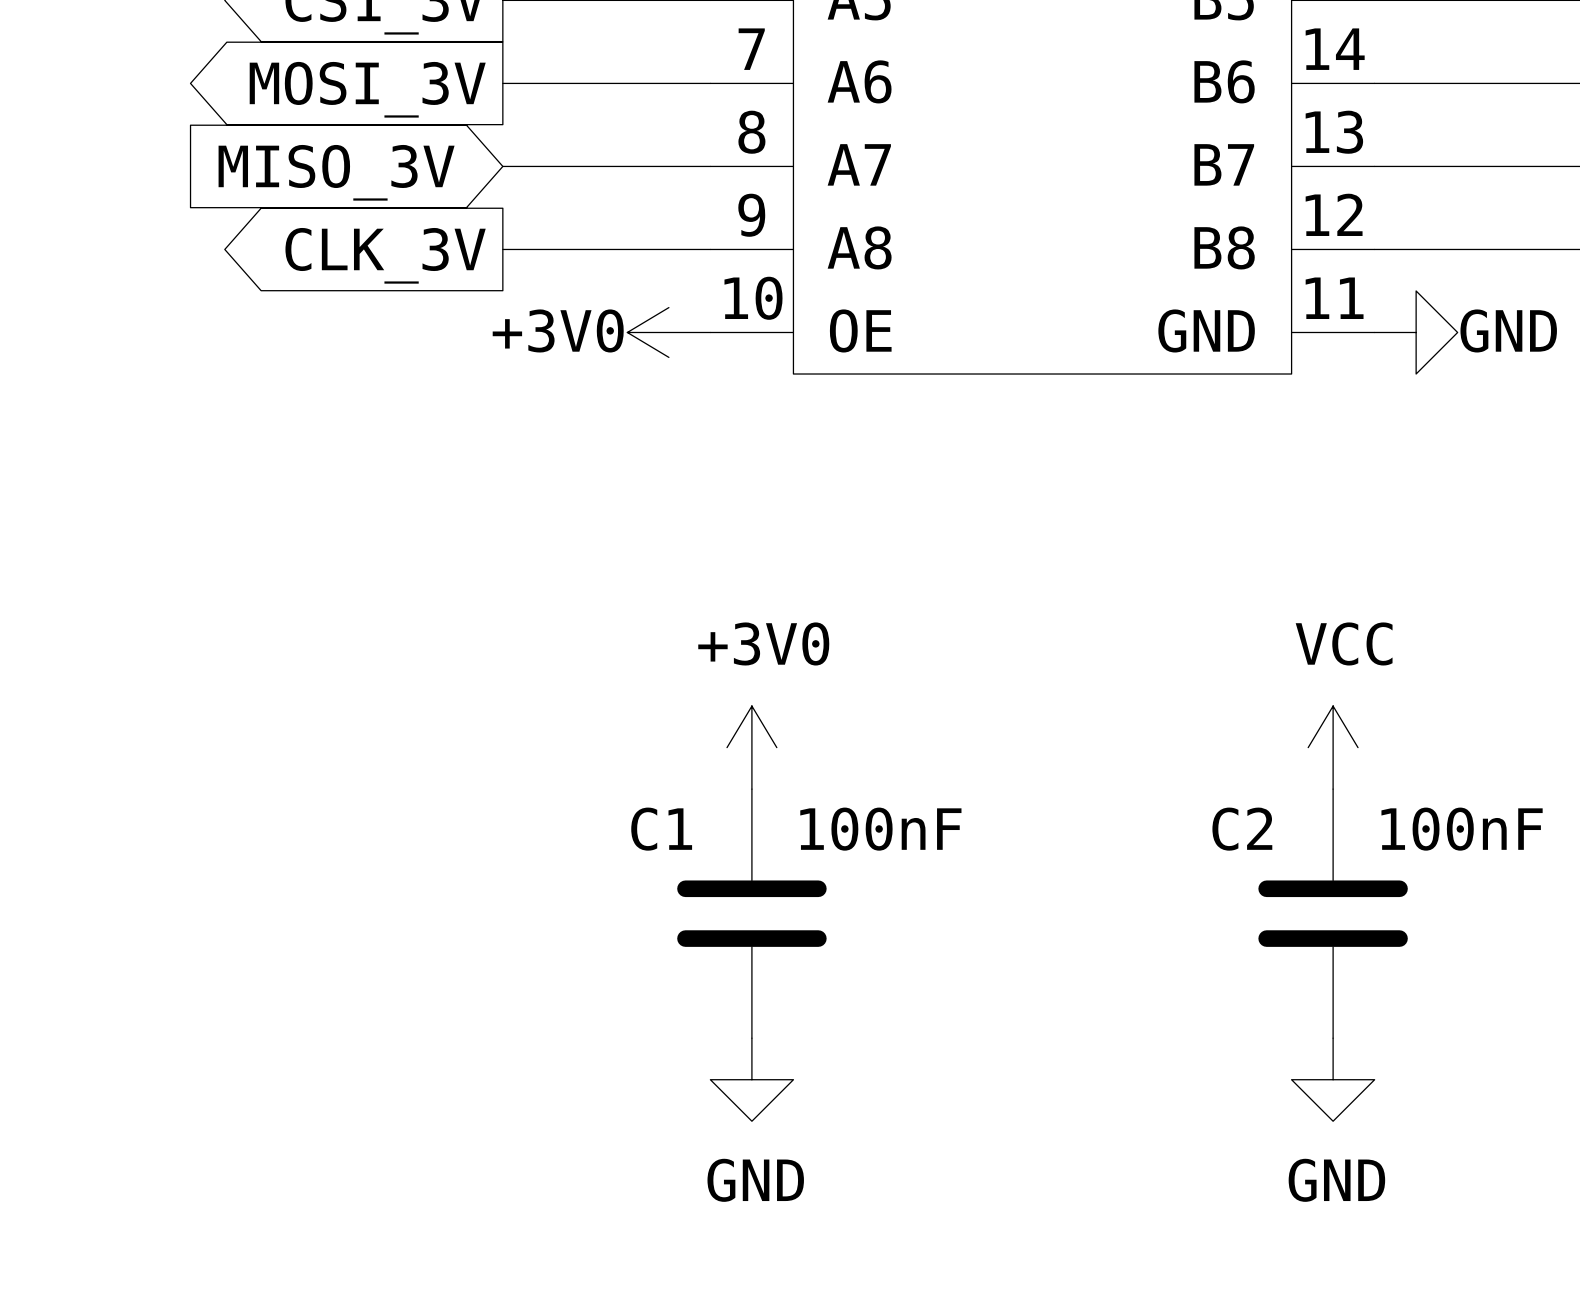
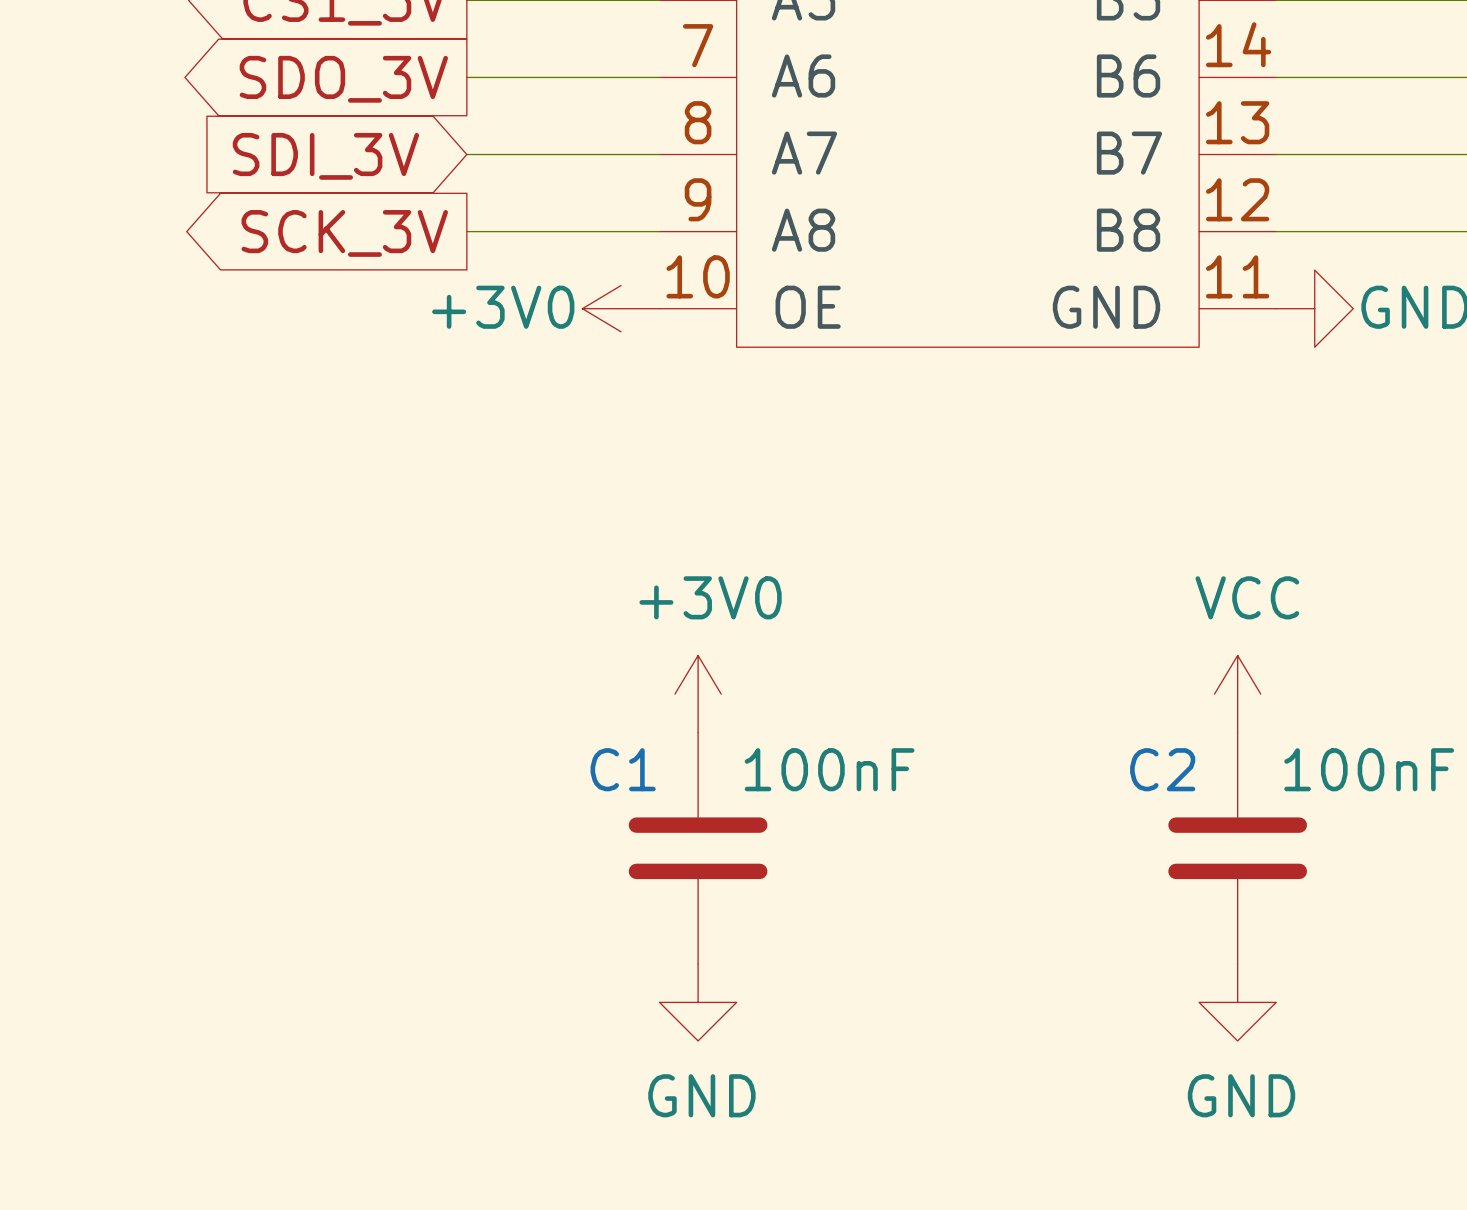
global label: MOSI_3V (367, 89) -> SDO_3V (343, 79)
global label: MISO_3V (336, 172) -> SDI_3V (325, 156)
global label: CLK_3V (385, 255) -> SCK_3V (344, 233)

